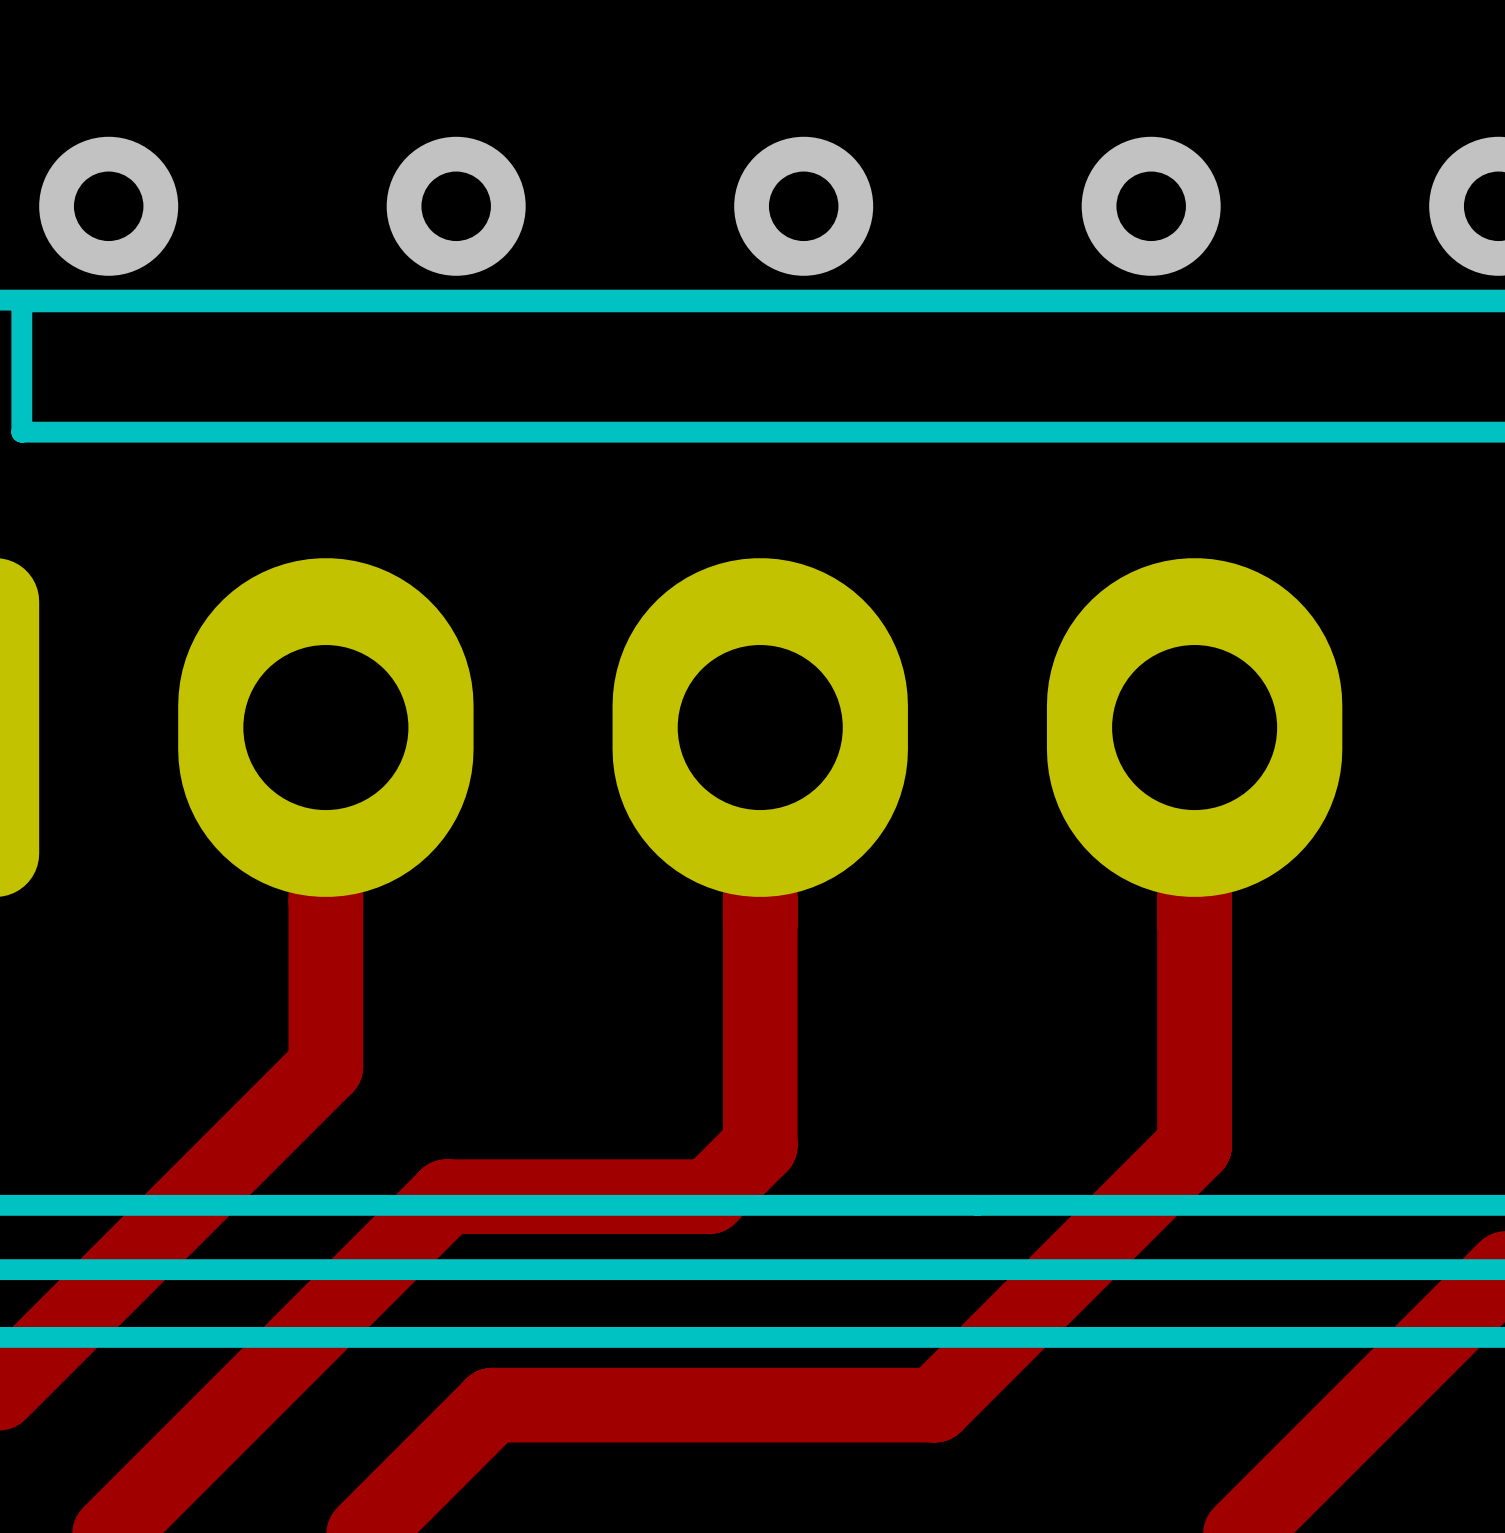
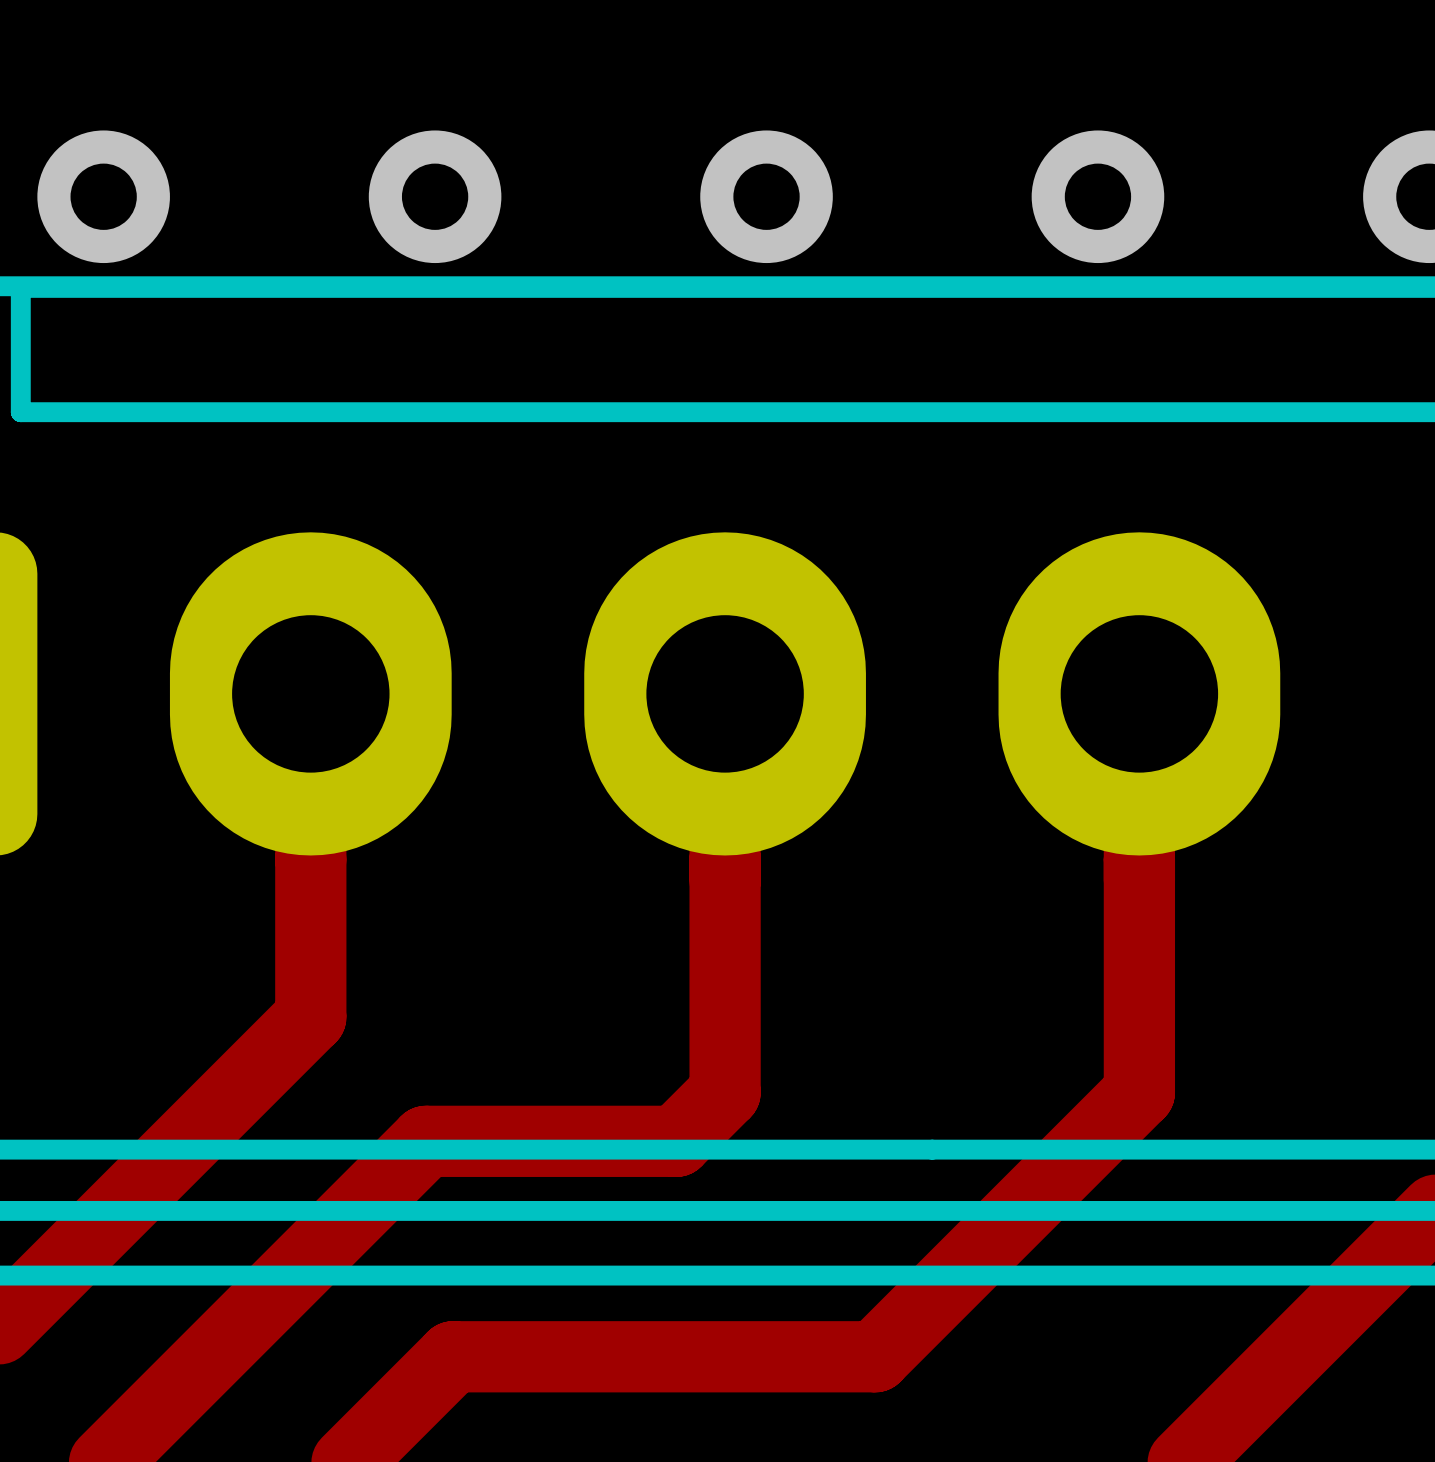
top track: (934, 1405) (492, 1405) (475, 1422) -> (891, 1340) (875, 1356) (453, 1356)

